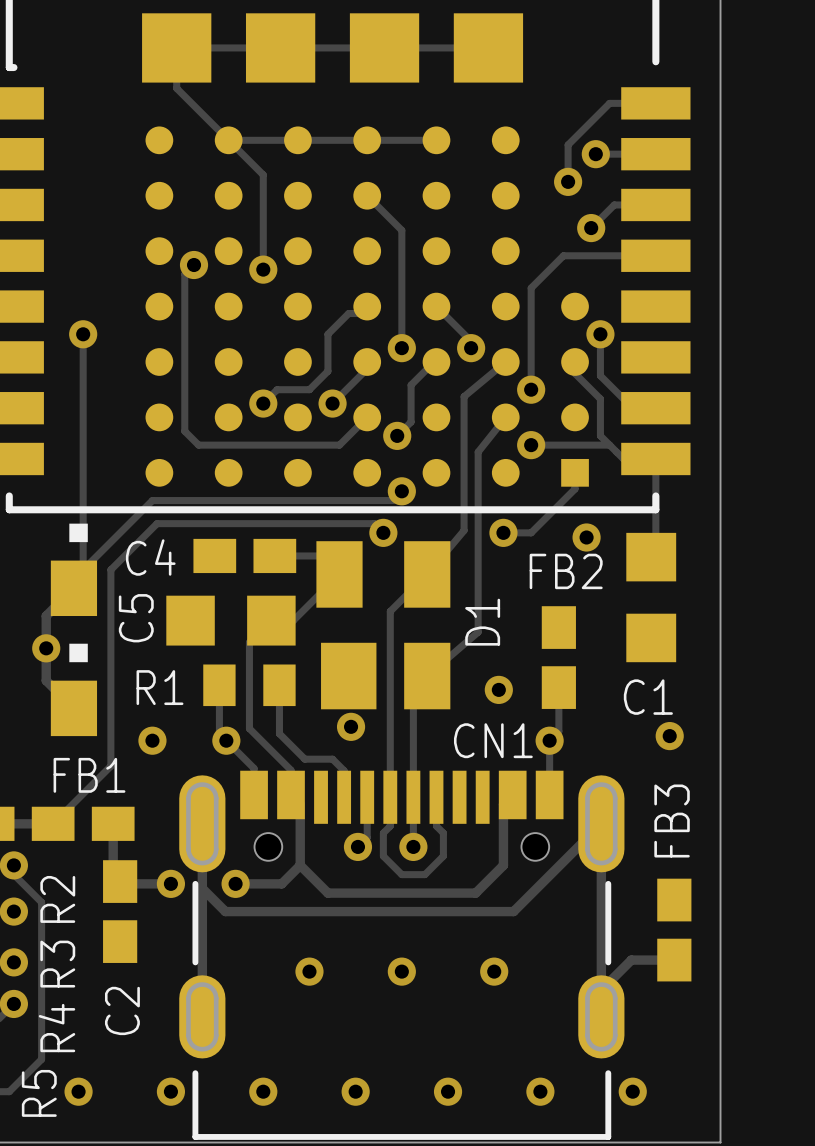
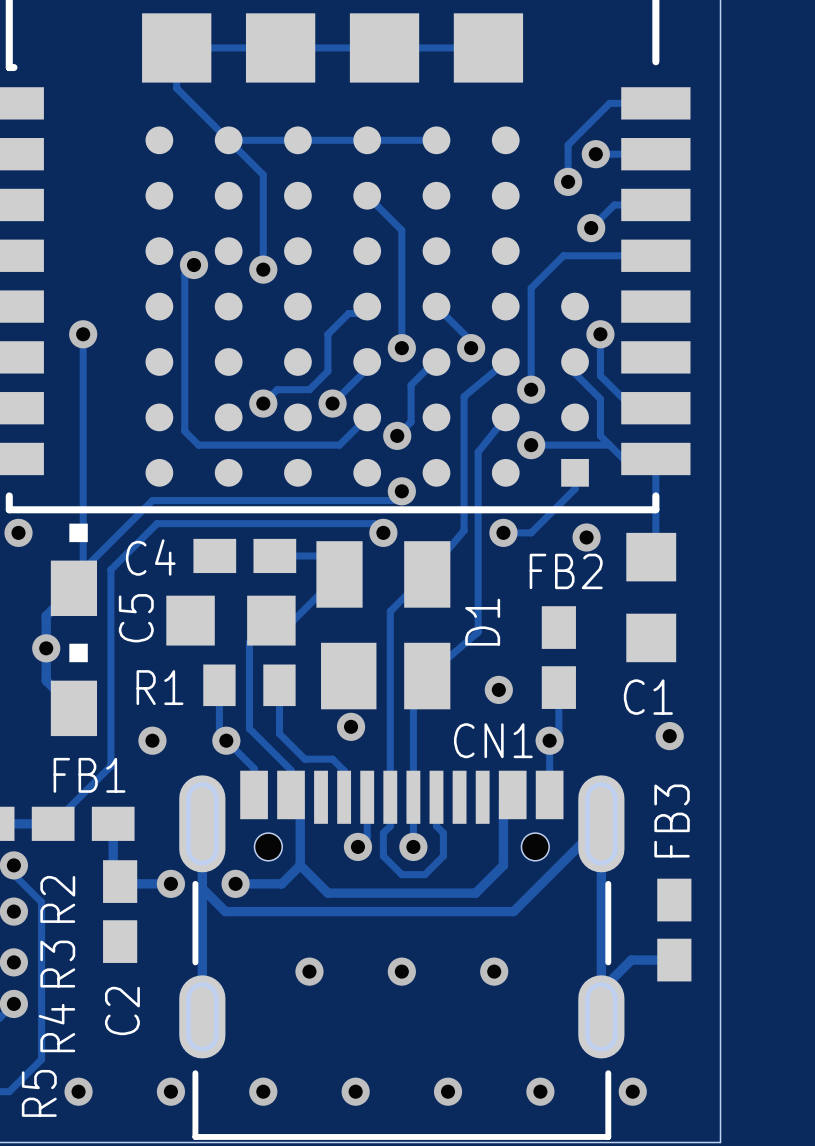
via: none -> (18, 532)

